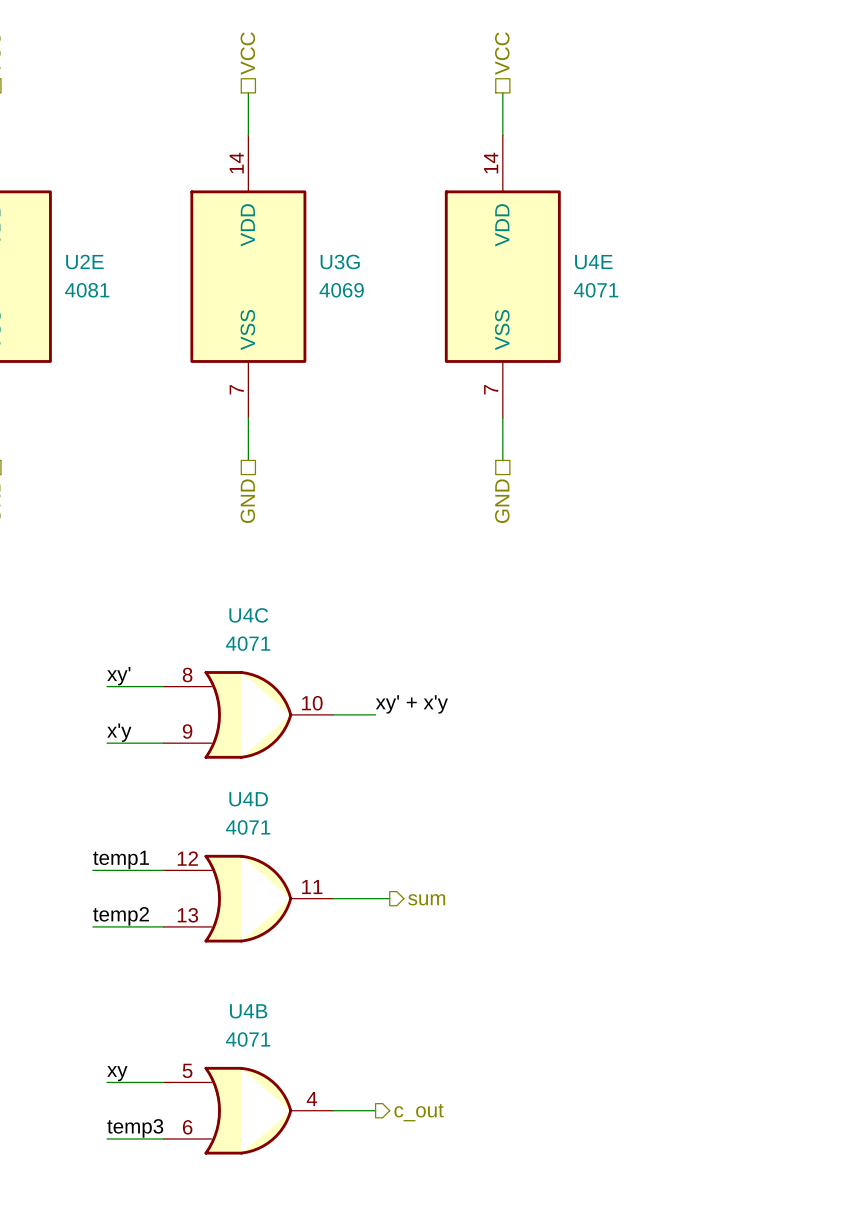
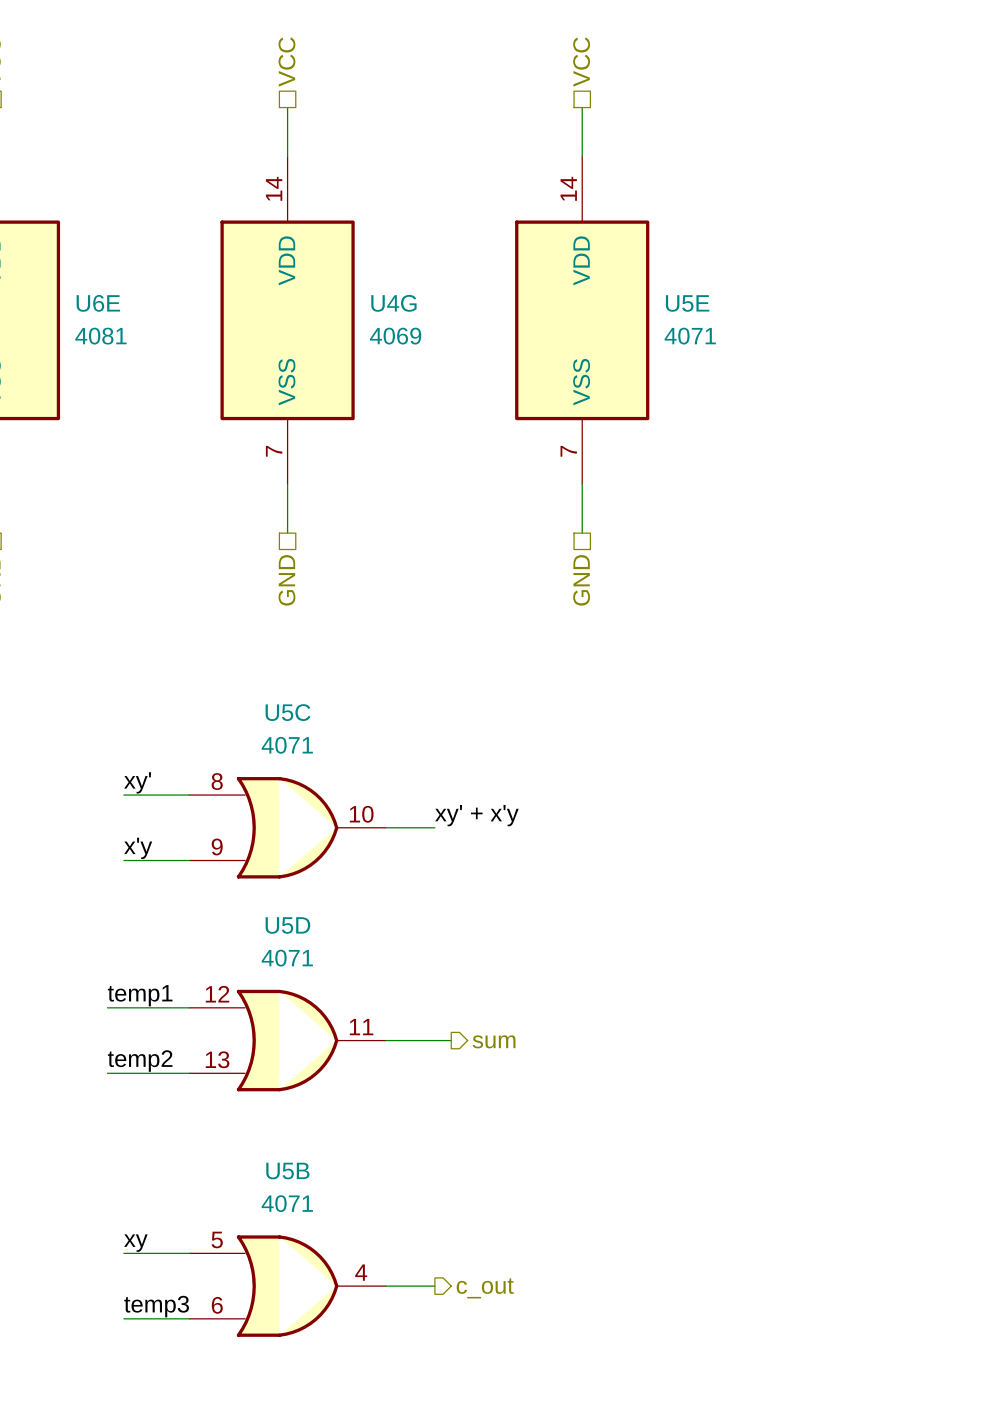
U2E name: U2E (84, 261) -> U6E (98, 303)
U3G name: U3G (340, 261) -> U4G (393, 303)
U4E name: U4E (593, 262) -> U5E (687, 303)
U4C name: U4C (248, 615) -> U5C (288, 712)
U4D name: U4D (248, 799) -> U5D (287, 925)
U4B name: U4B (248, 1011) -> U5B (287, 1171)

